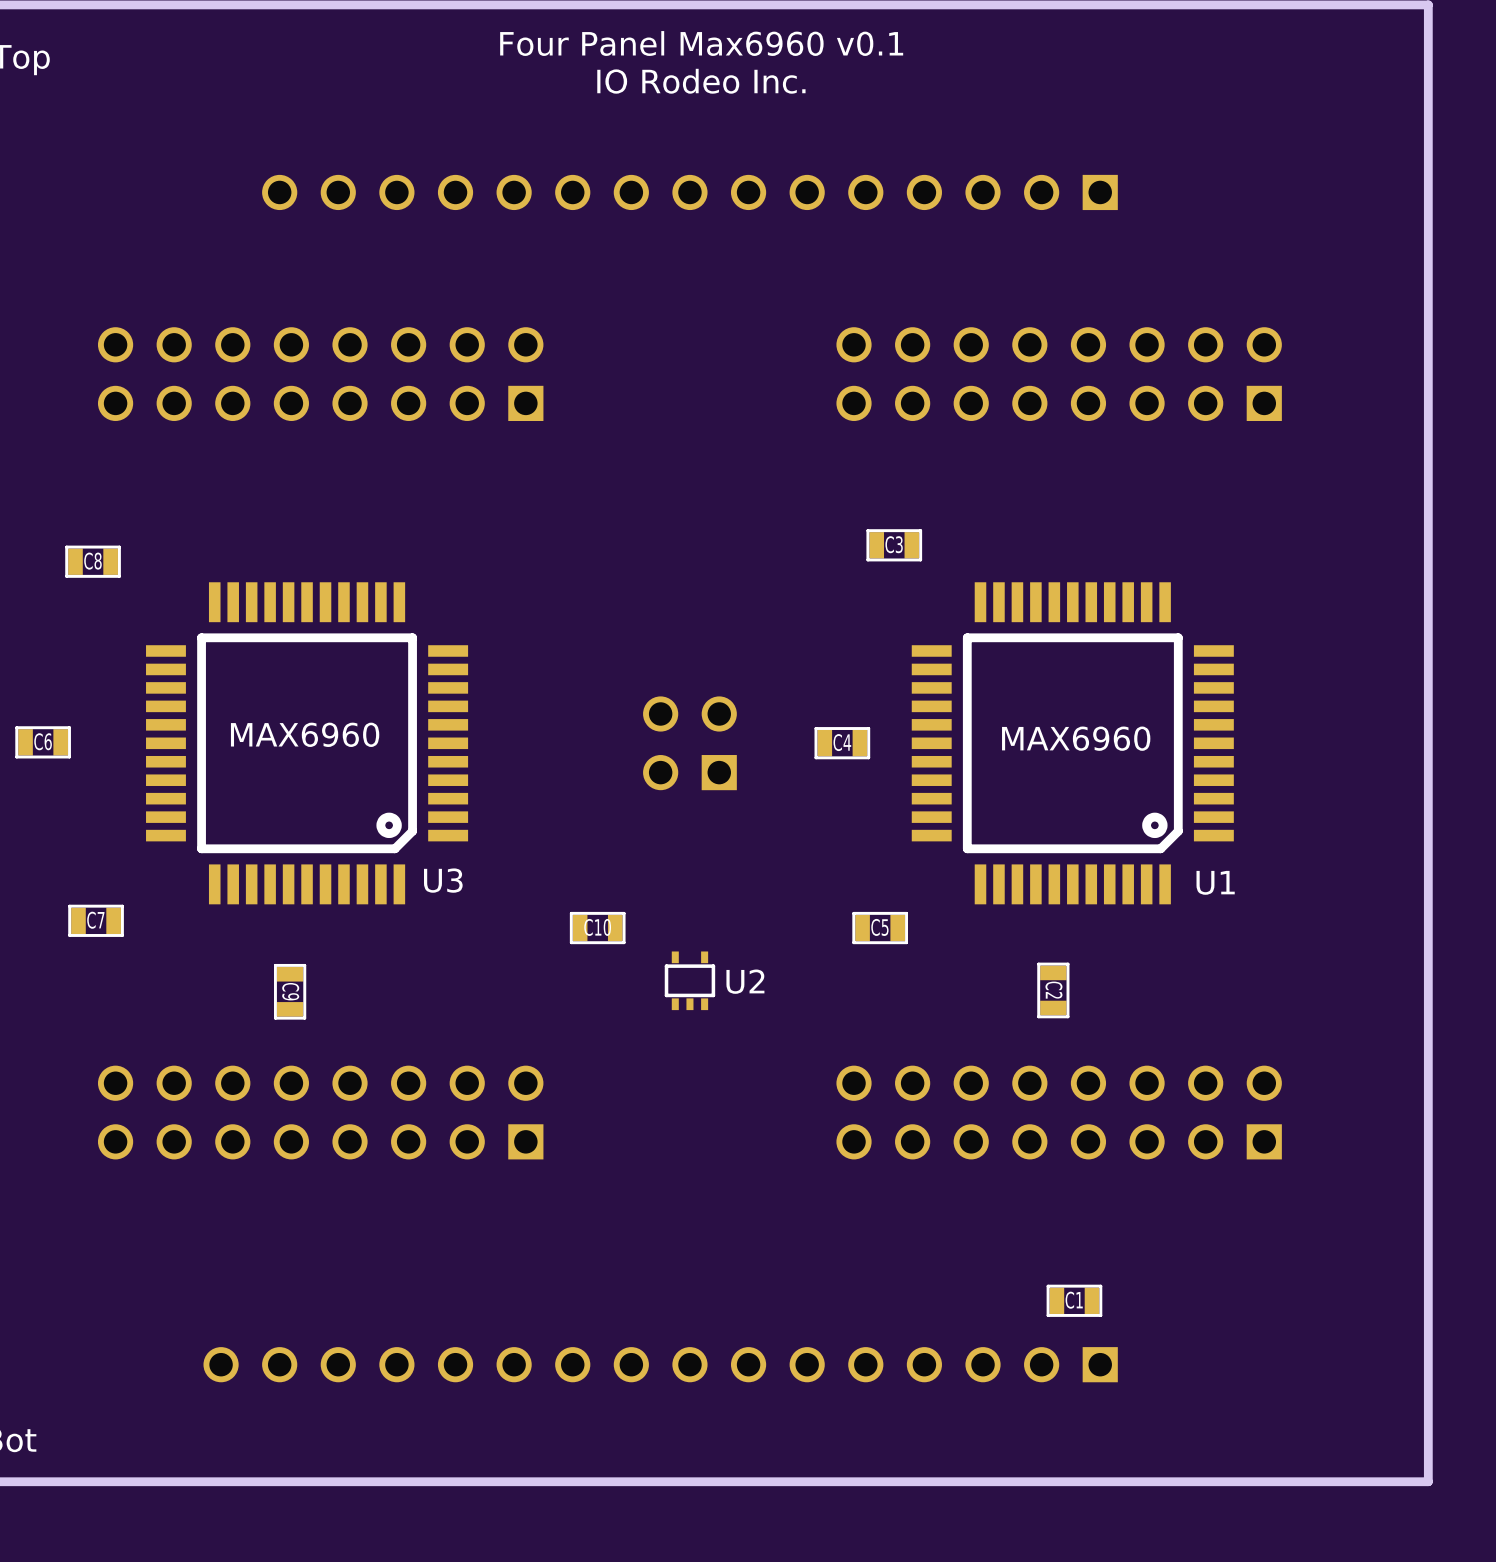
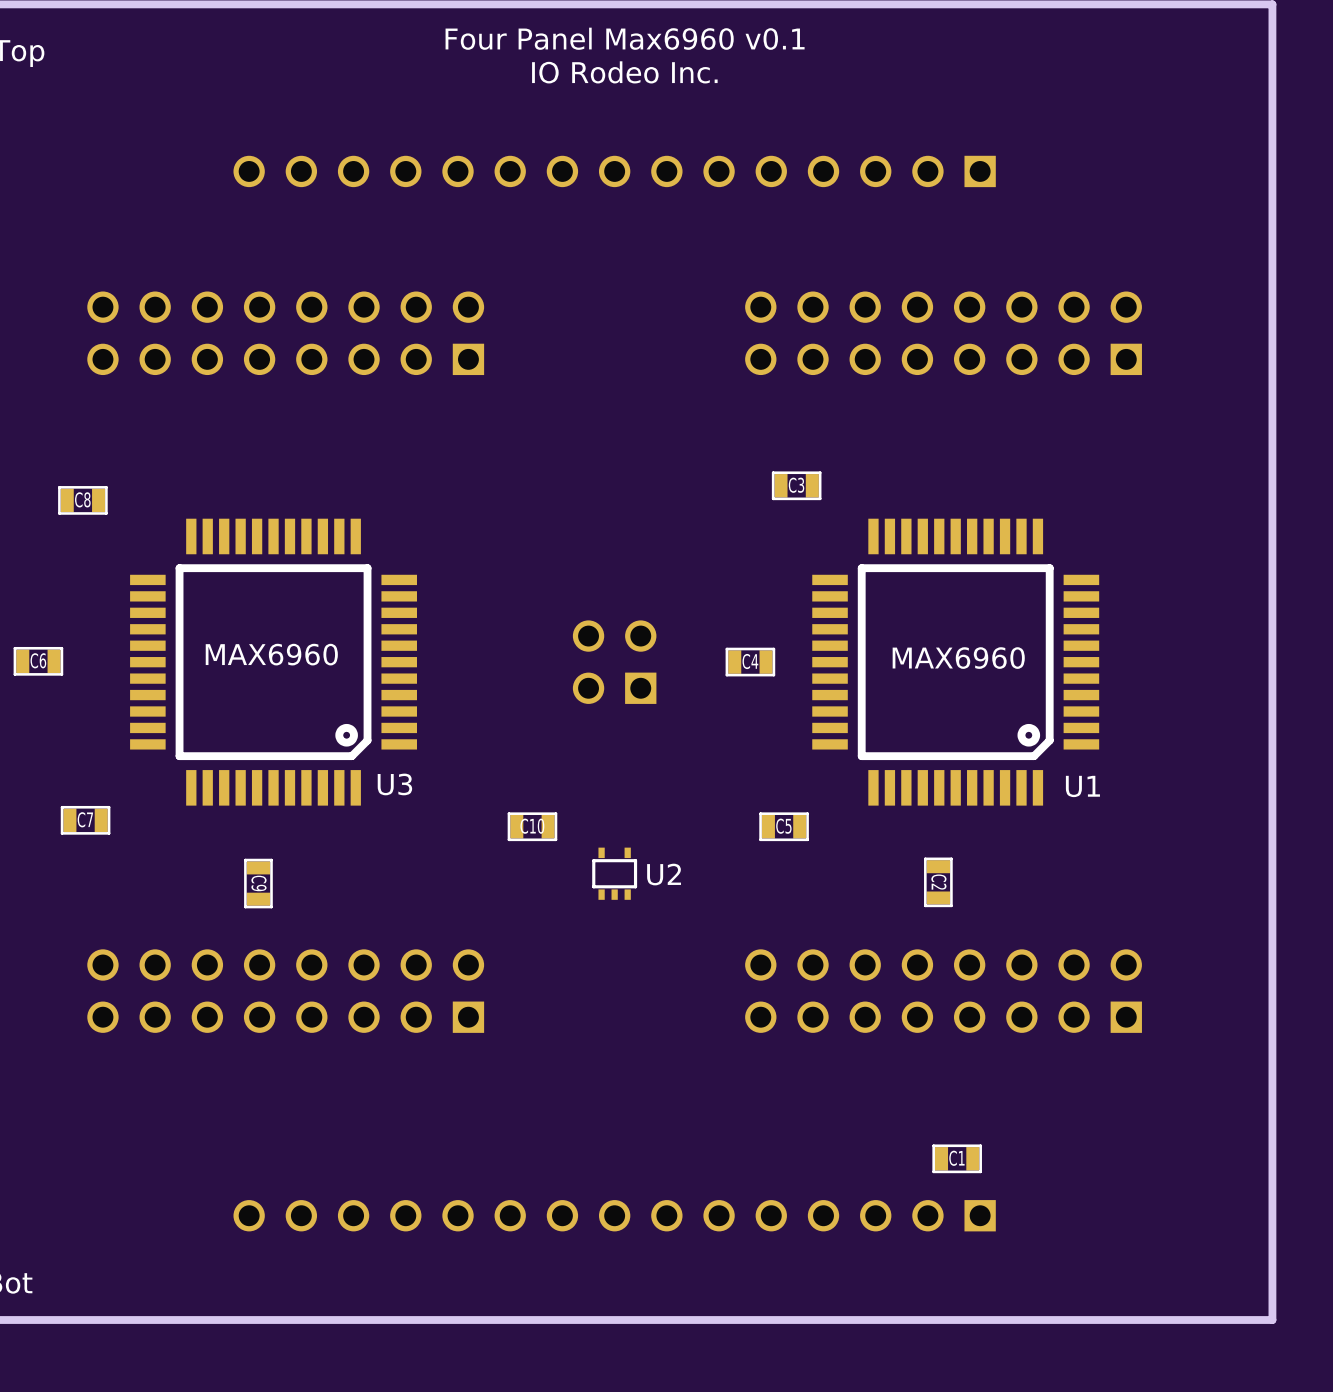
part: (660, 1364) -> none

